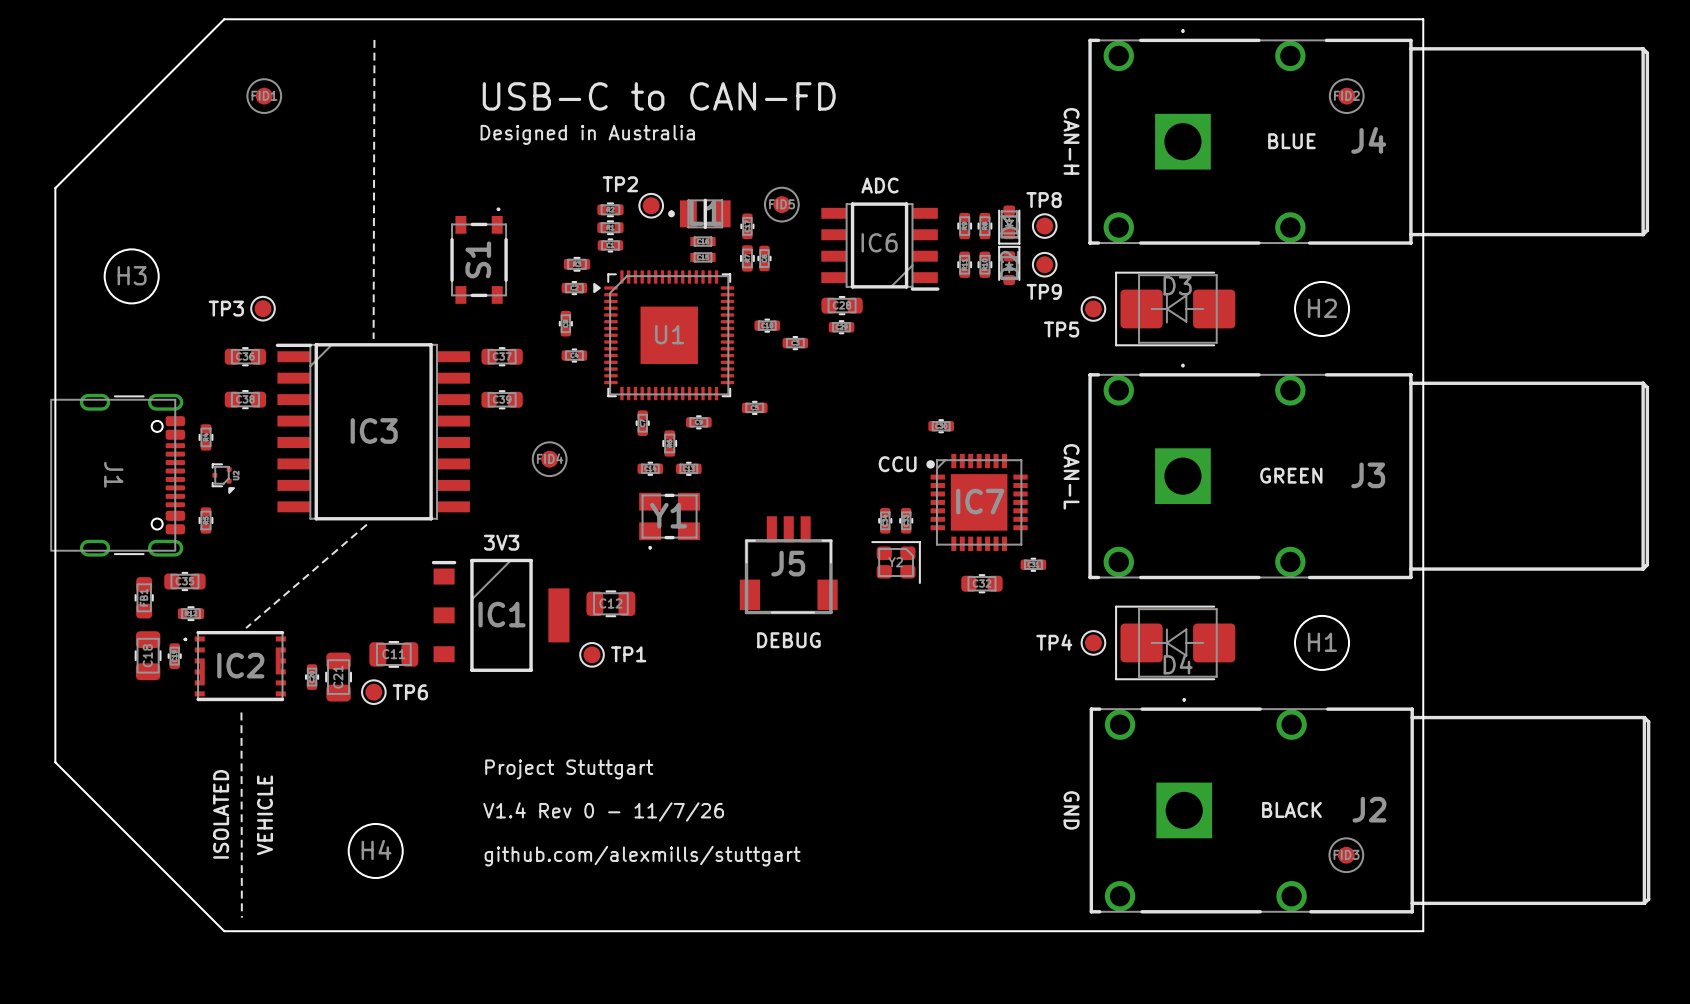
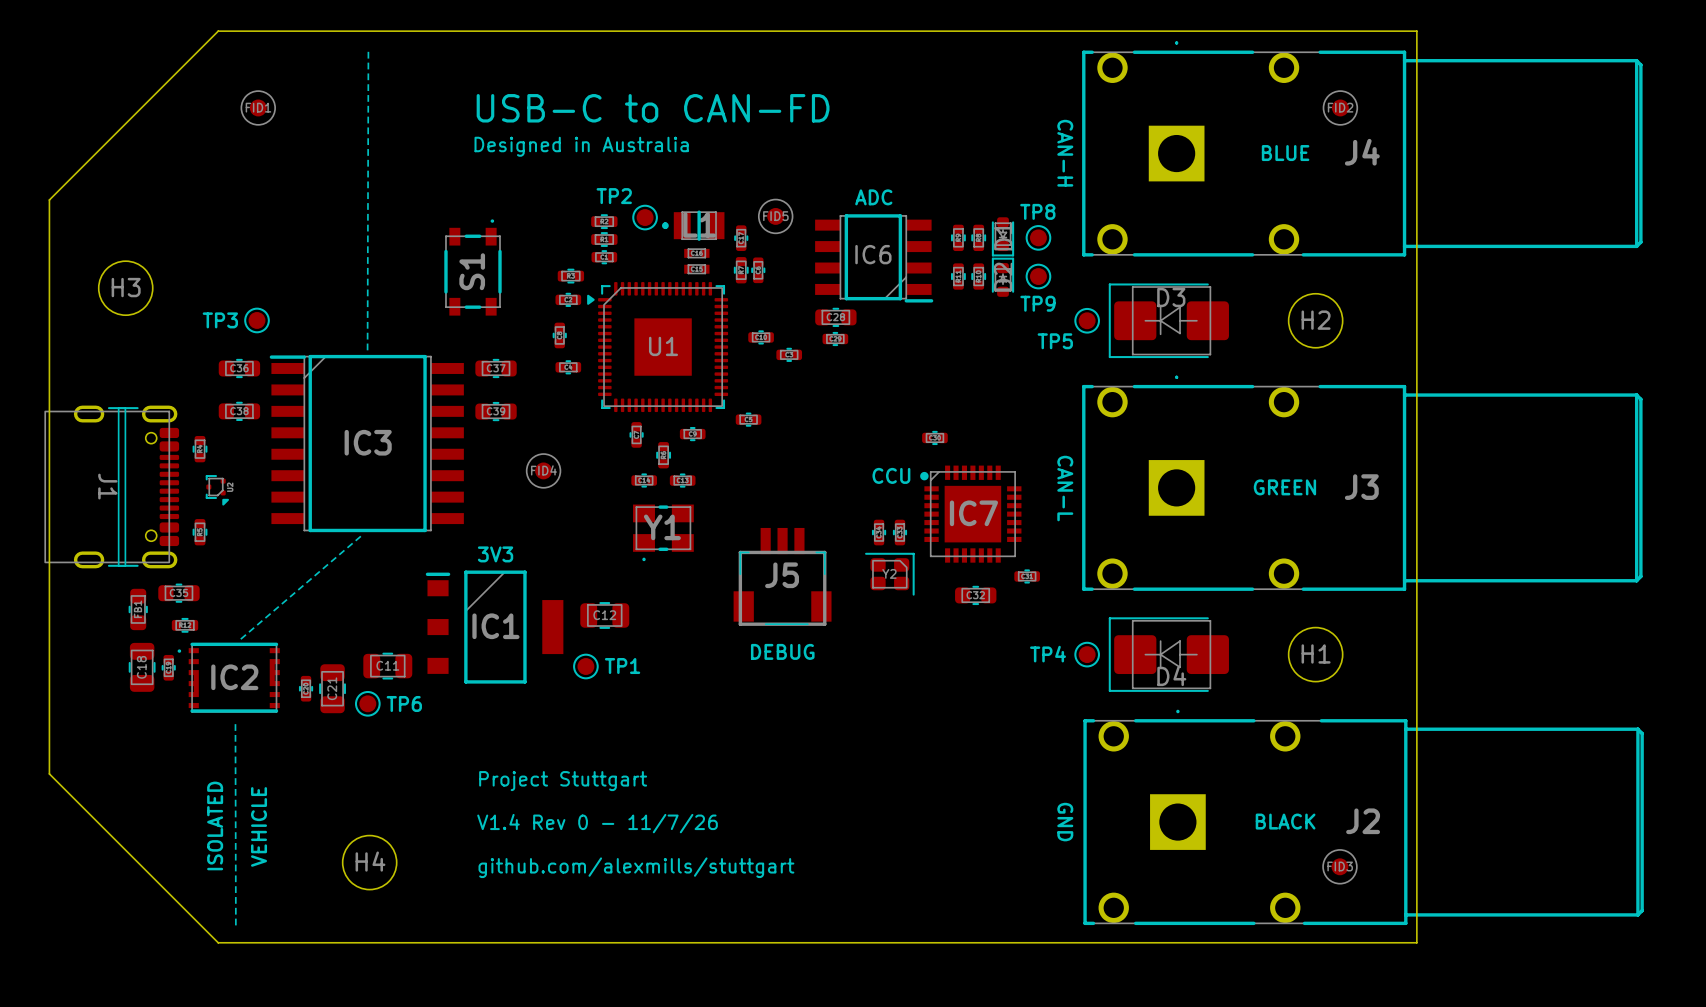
line: none -> (118, 408) (125, 408) (125, 565) (118, 565) (118, 408)

